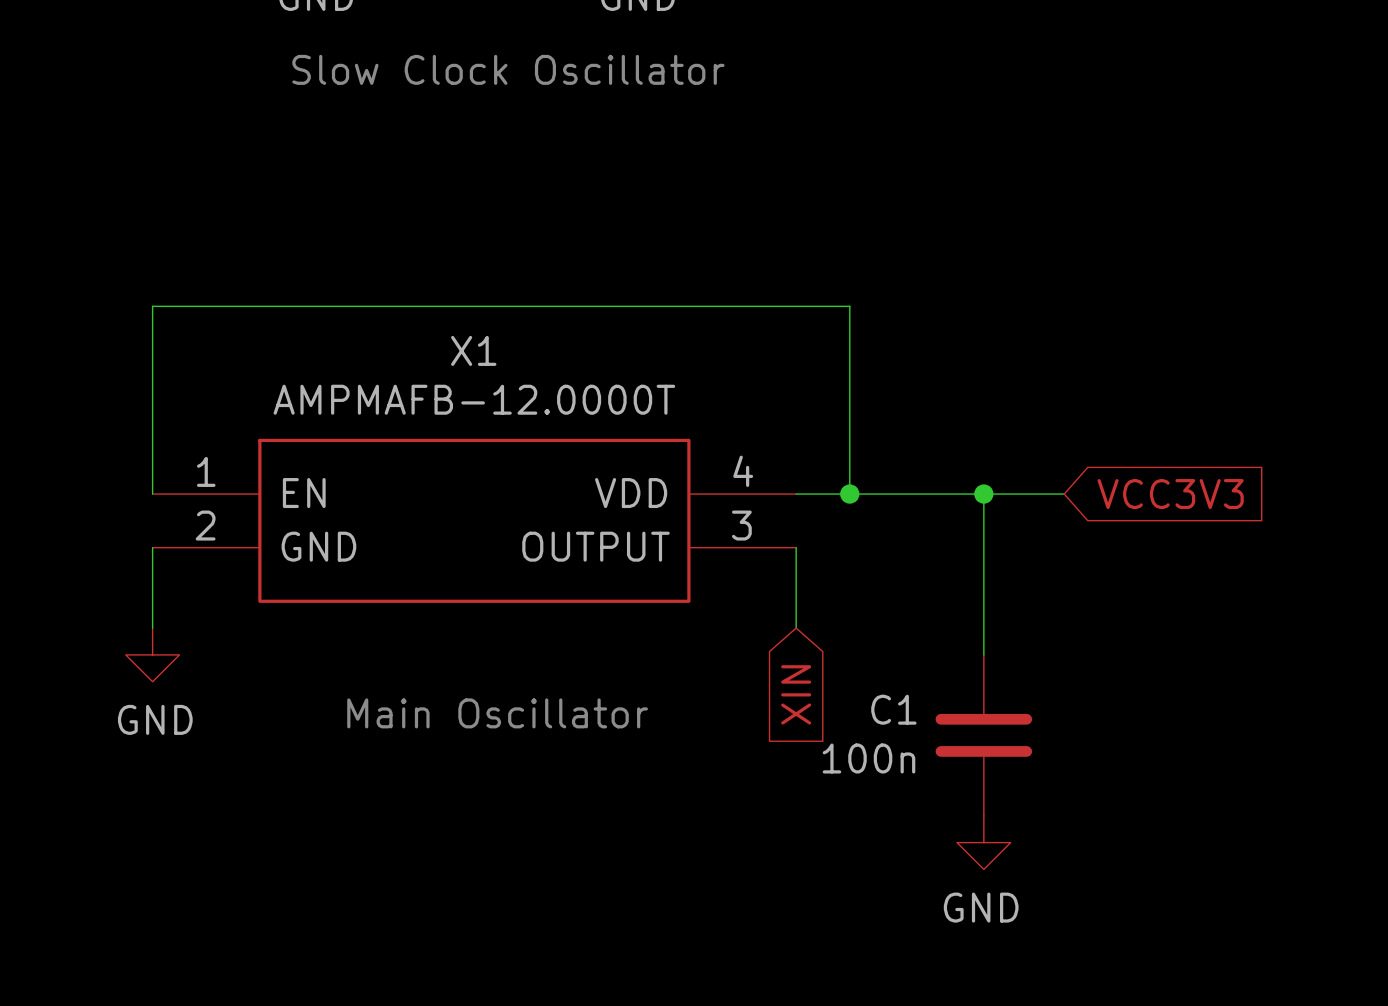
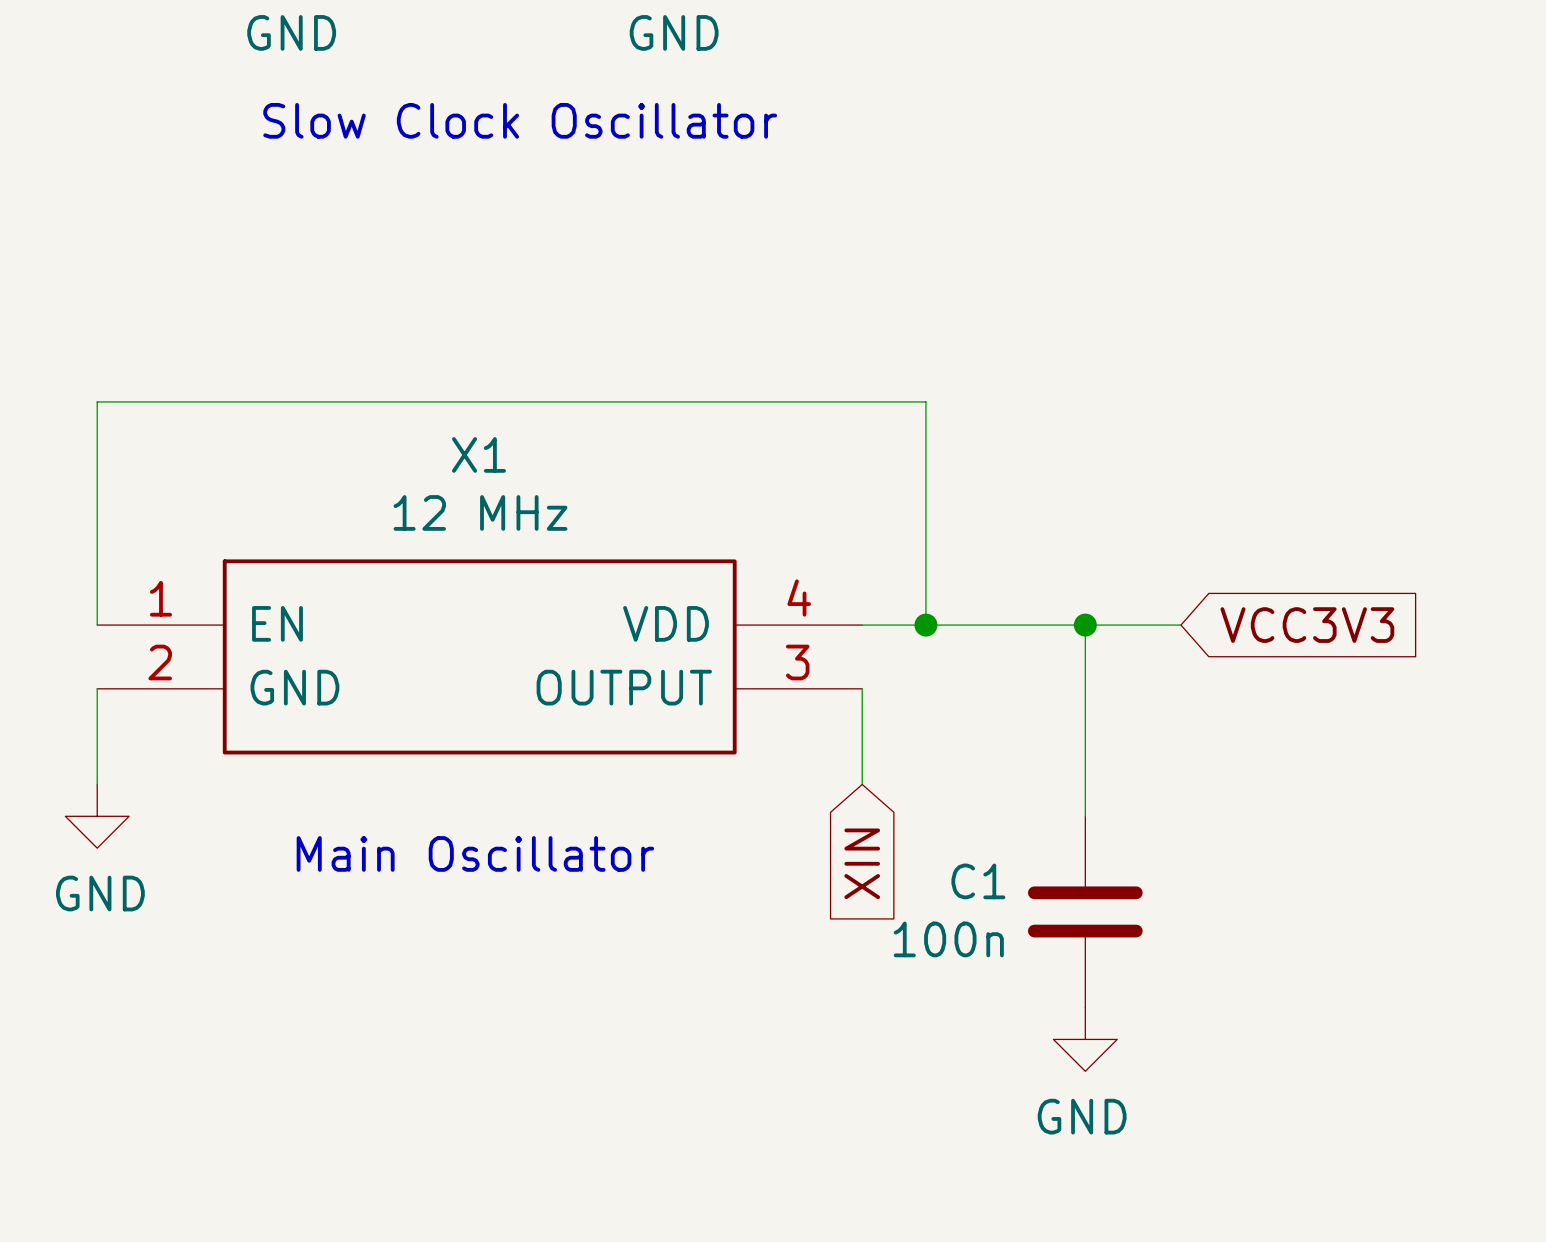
X1 value: AMPMAFB-12.0000T (474, 399) -> 12 MHz (480, 512)
text position: Main Oscillator (497, 713) -> Main Oscillator (475, 853)

